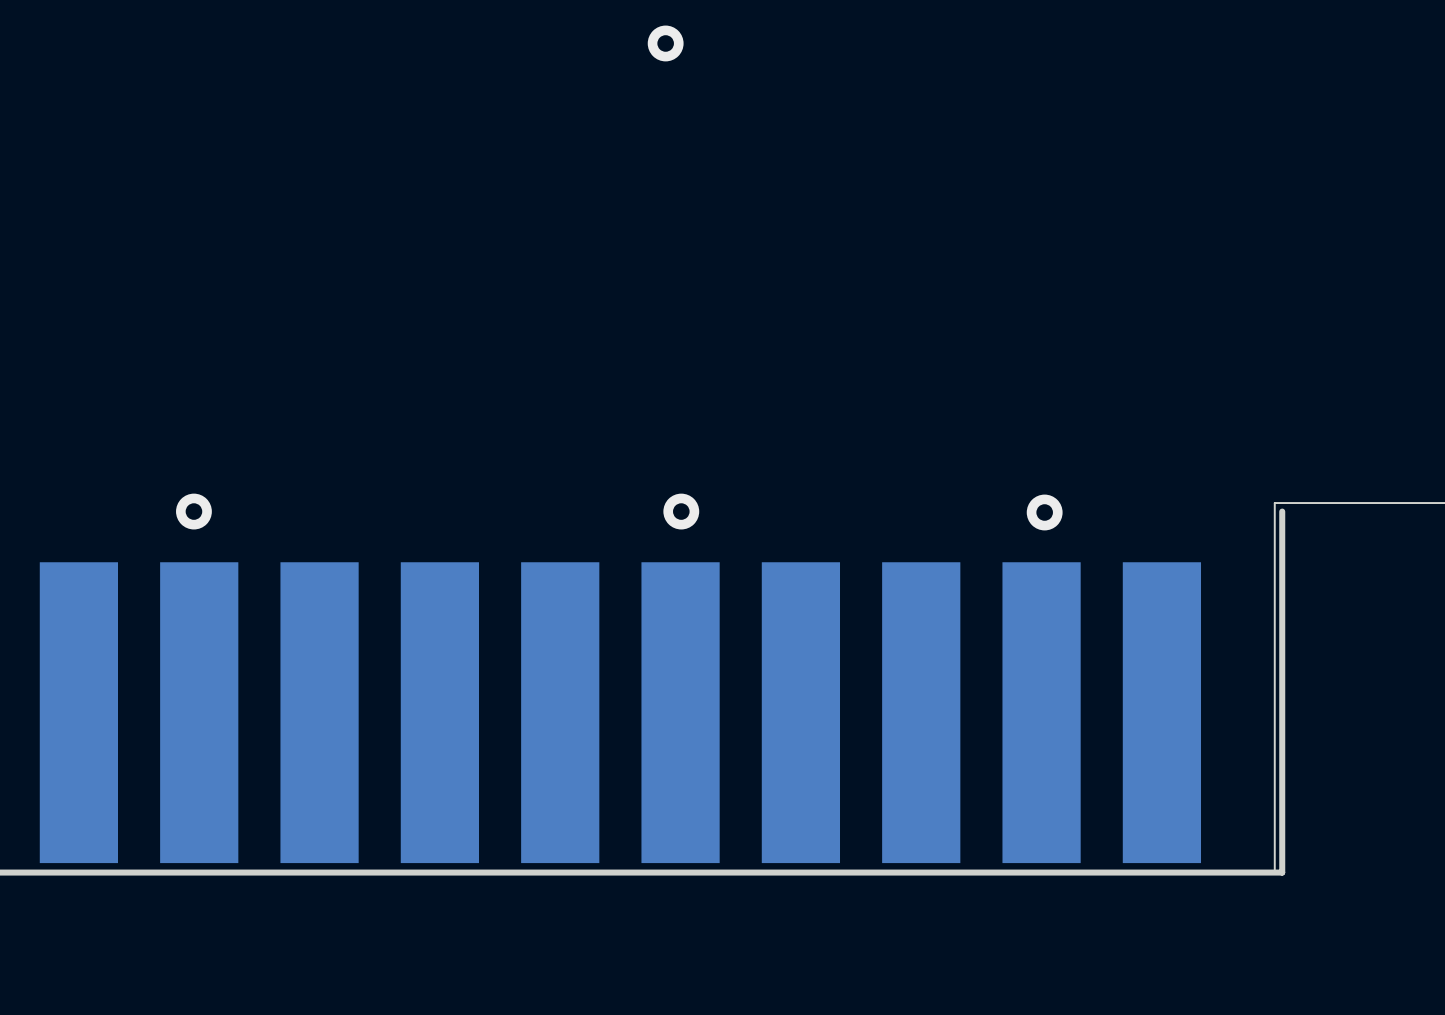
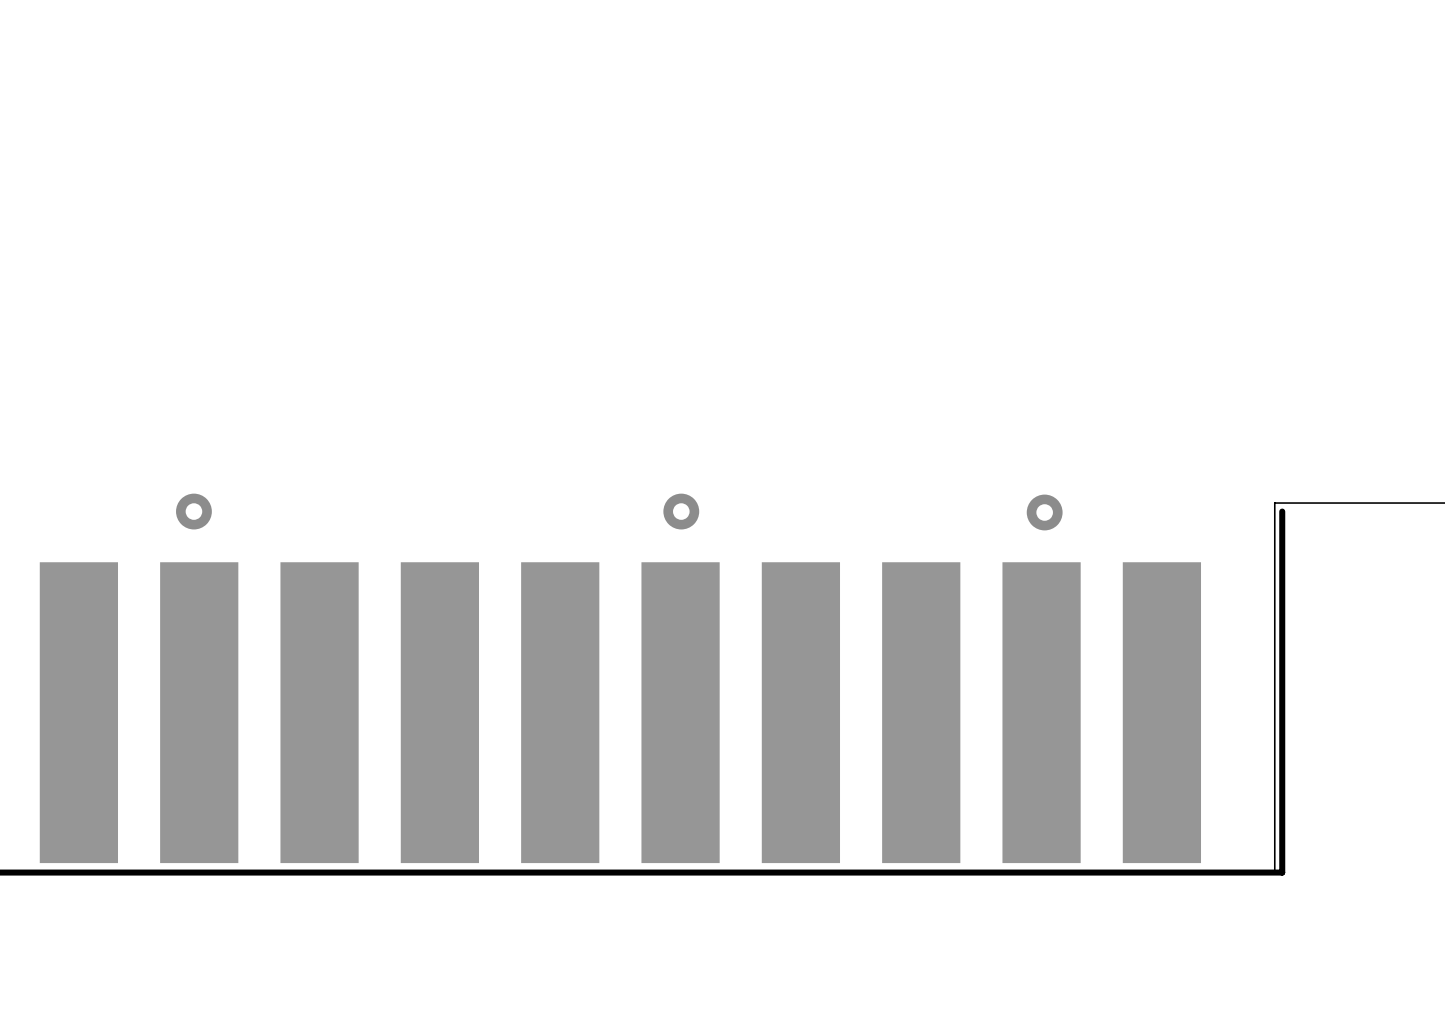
via: (665, 43) -> none

